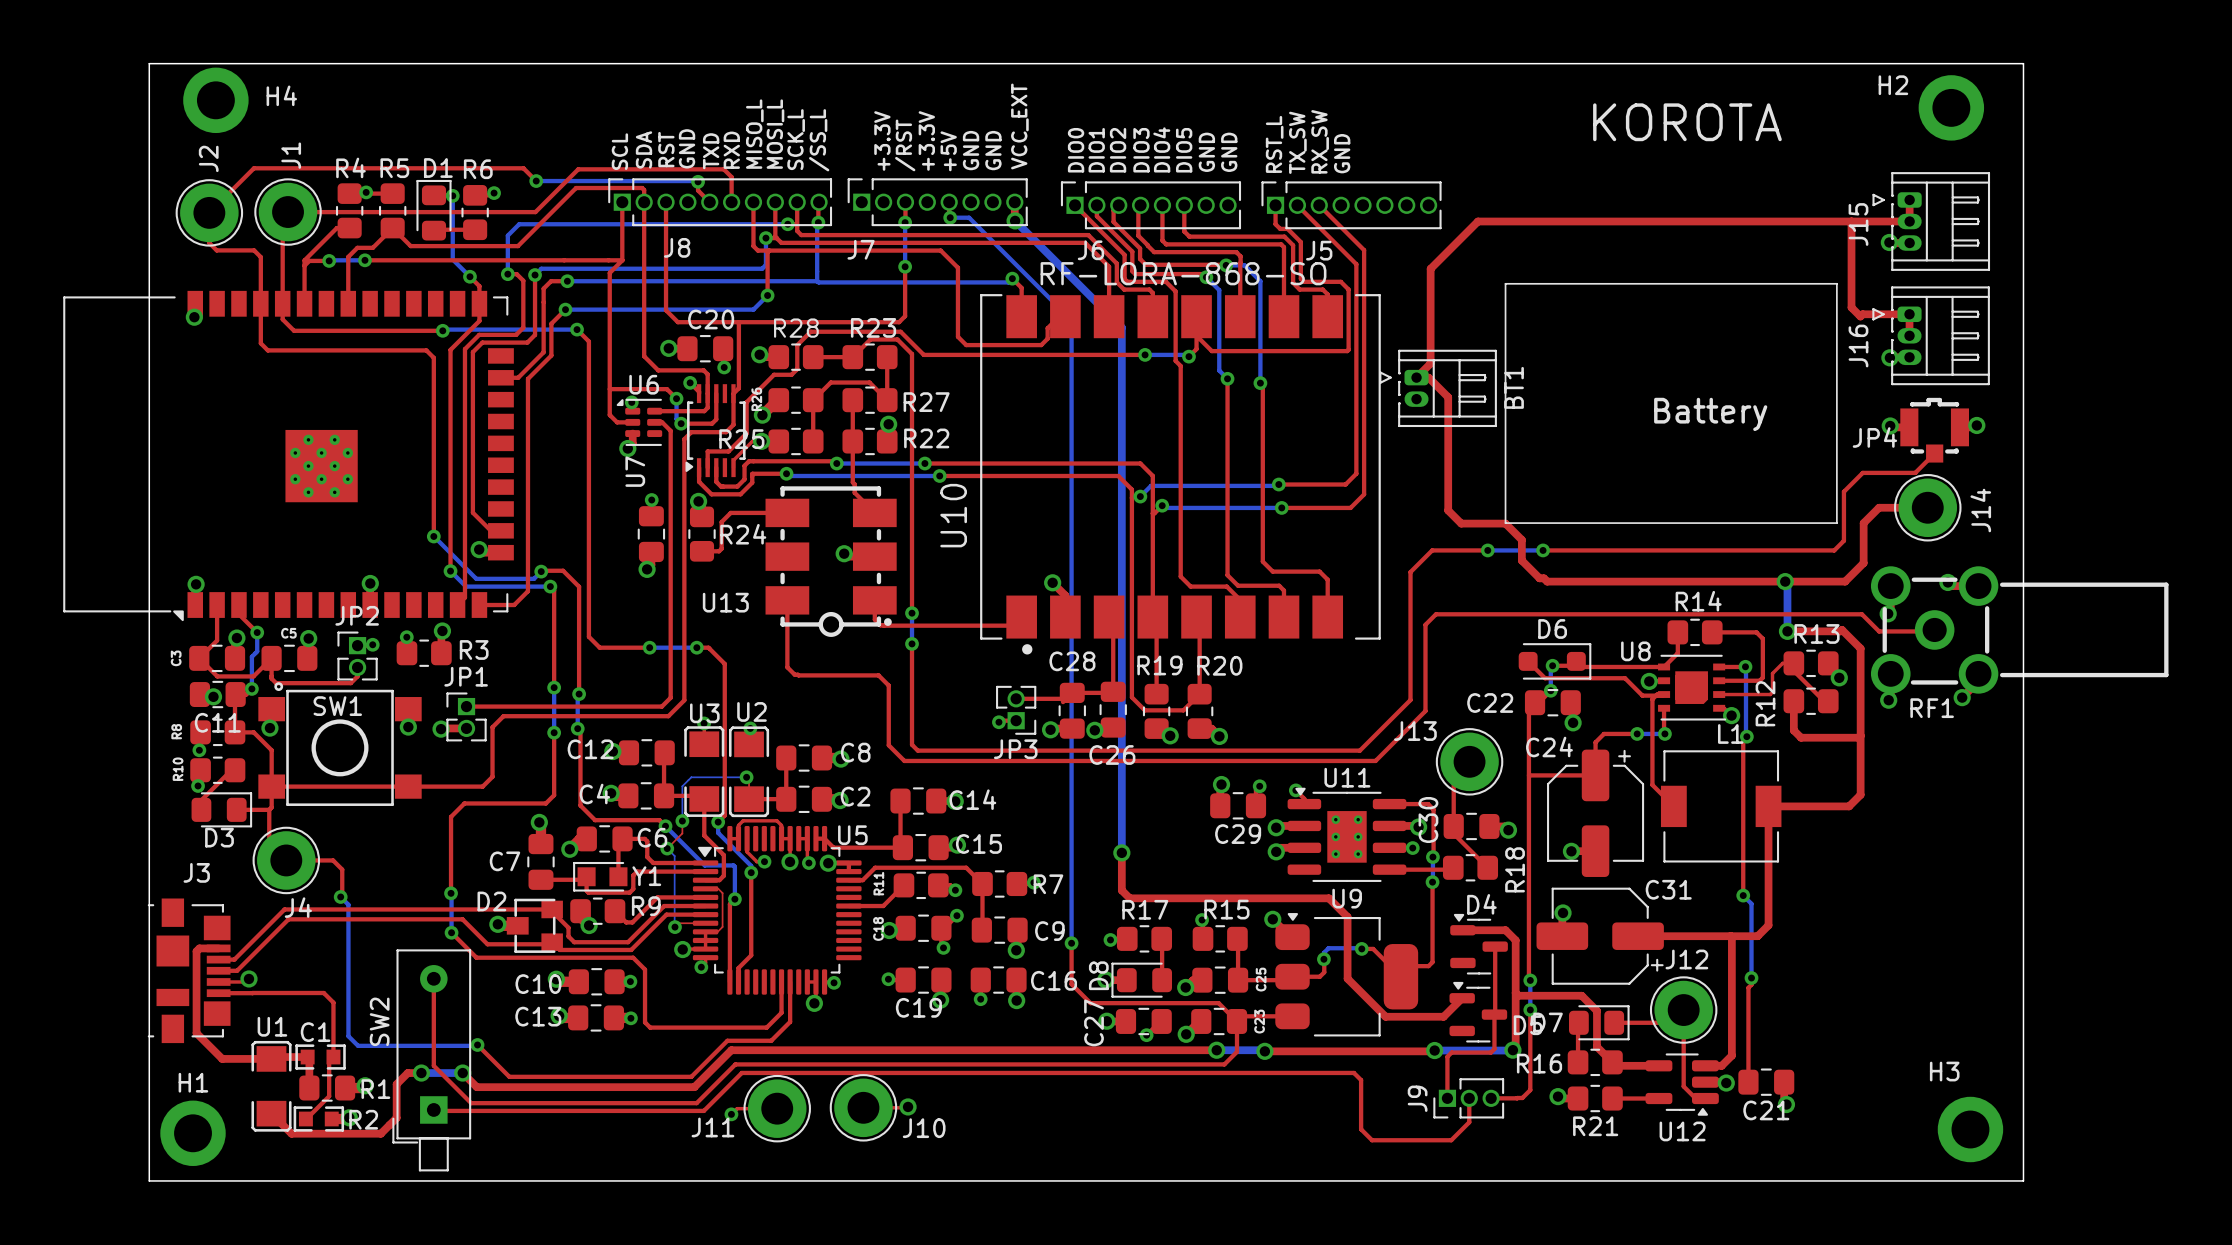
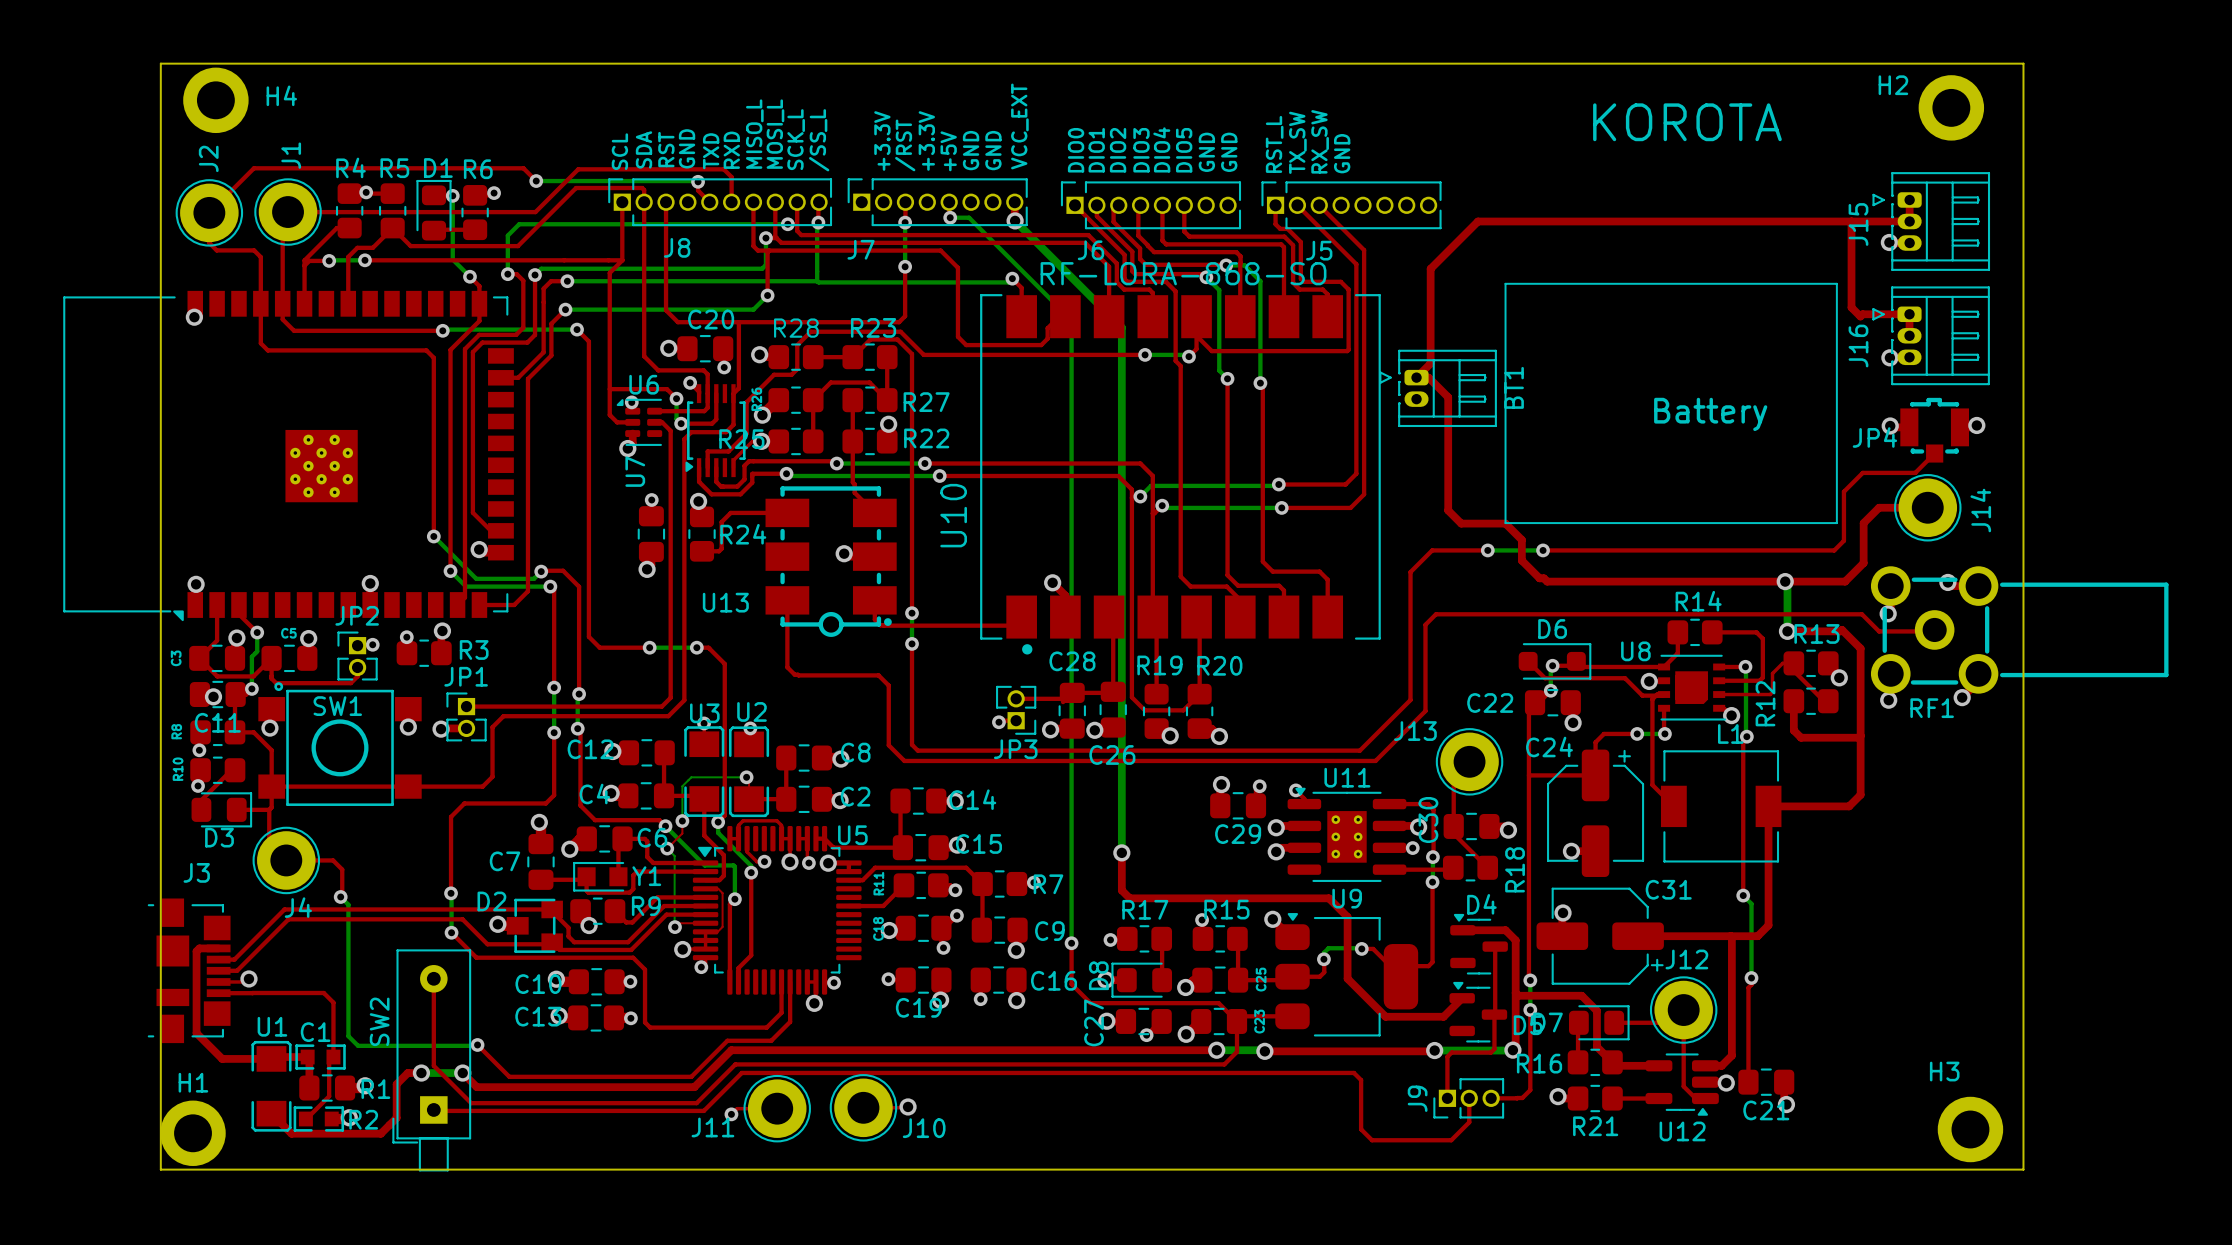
board edge: (160, 63) (149, 63) (149, 1180) (2023, 1180) (2023, 1169) -> (160, 63) (160, 1169) (2023, 1169)

